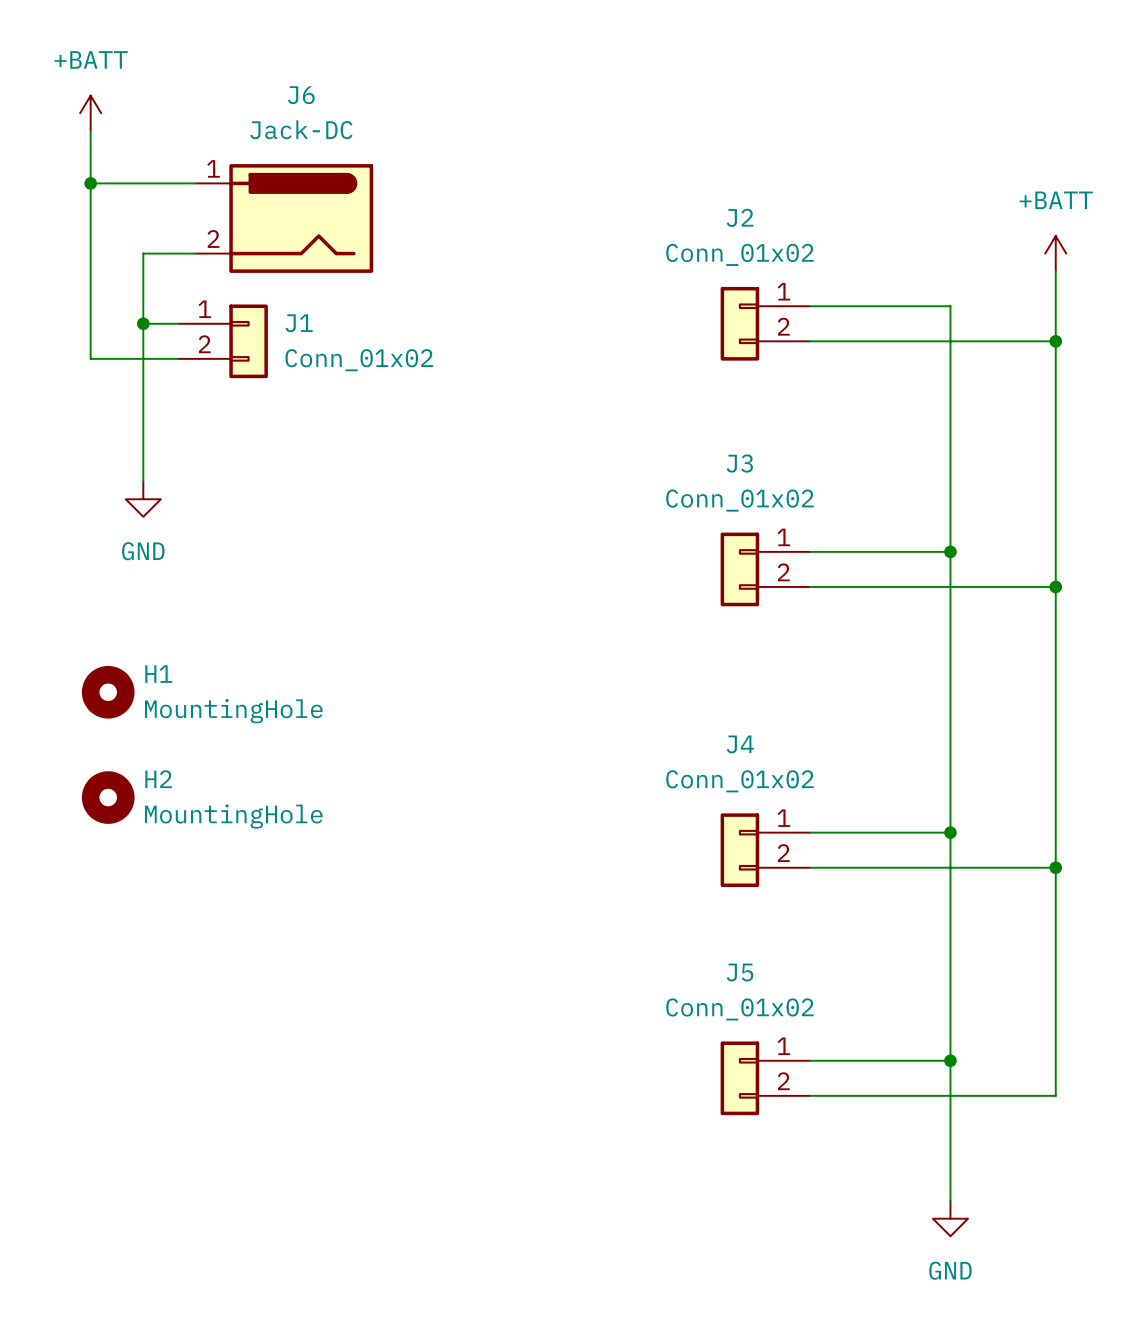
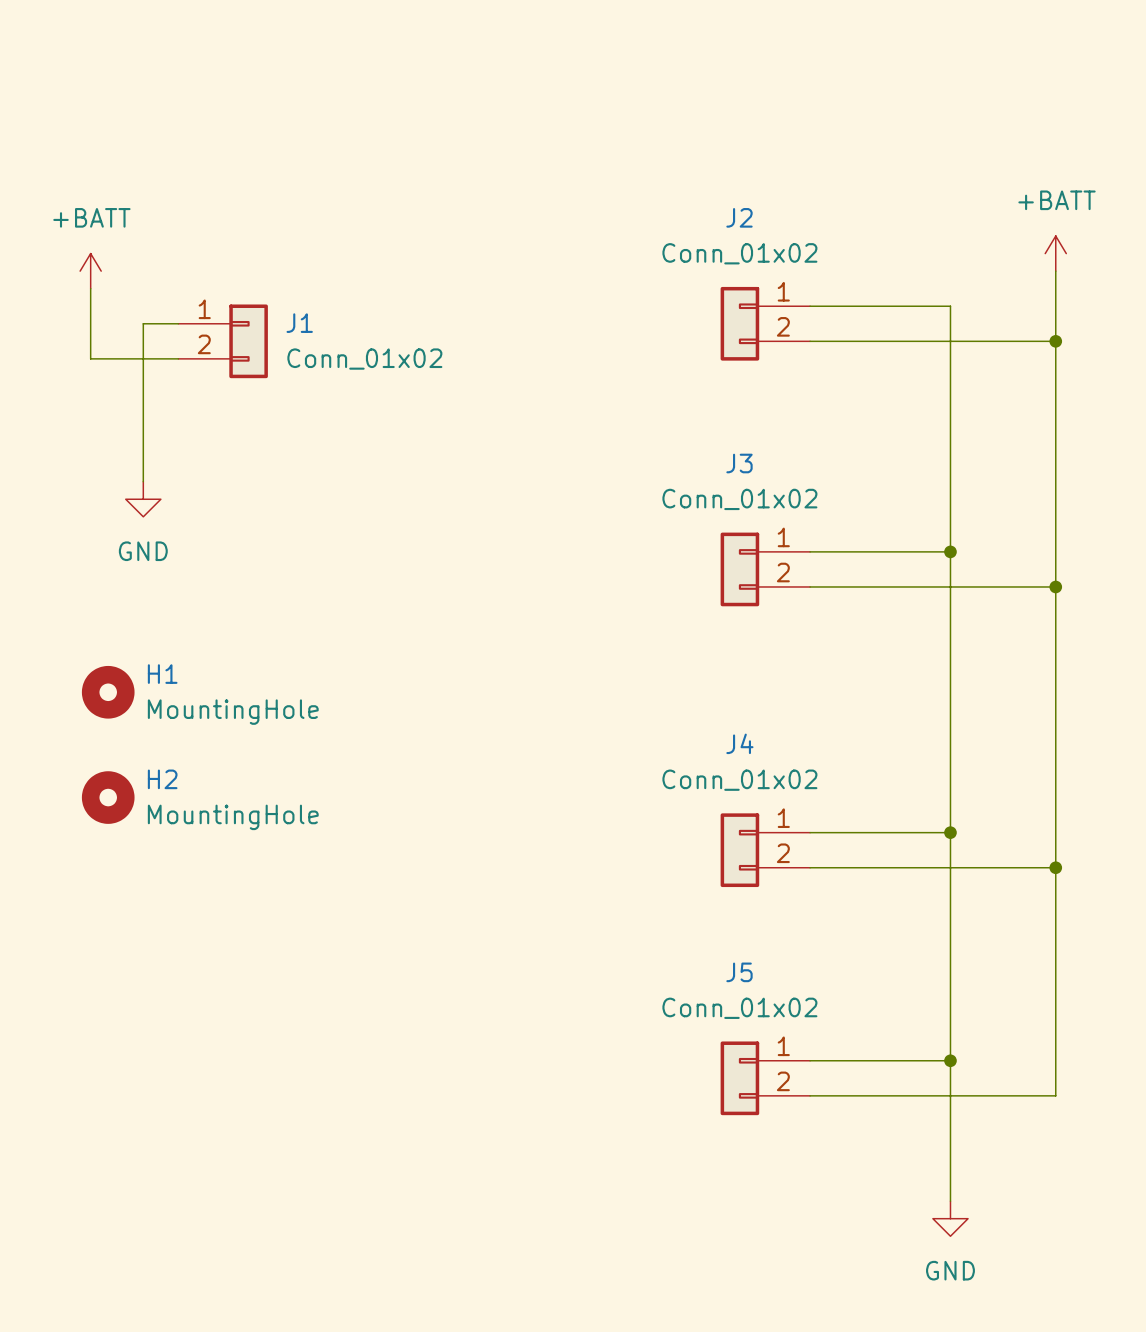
power symbol position: +BATT (90, 113) -> +BATT (90, 271)
wire: (90, 130) (90, 288) -> none
wire: (90, 183) (195, 183) -> none
junction: (90, 183) -> none
J6: Jack-DC (284, 218) -> none
wire: (195, 253) (143, 253) (143, 323) -> none
junction: (143, 323) -> none

